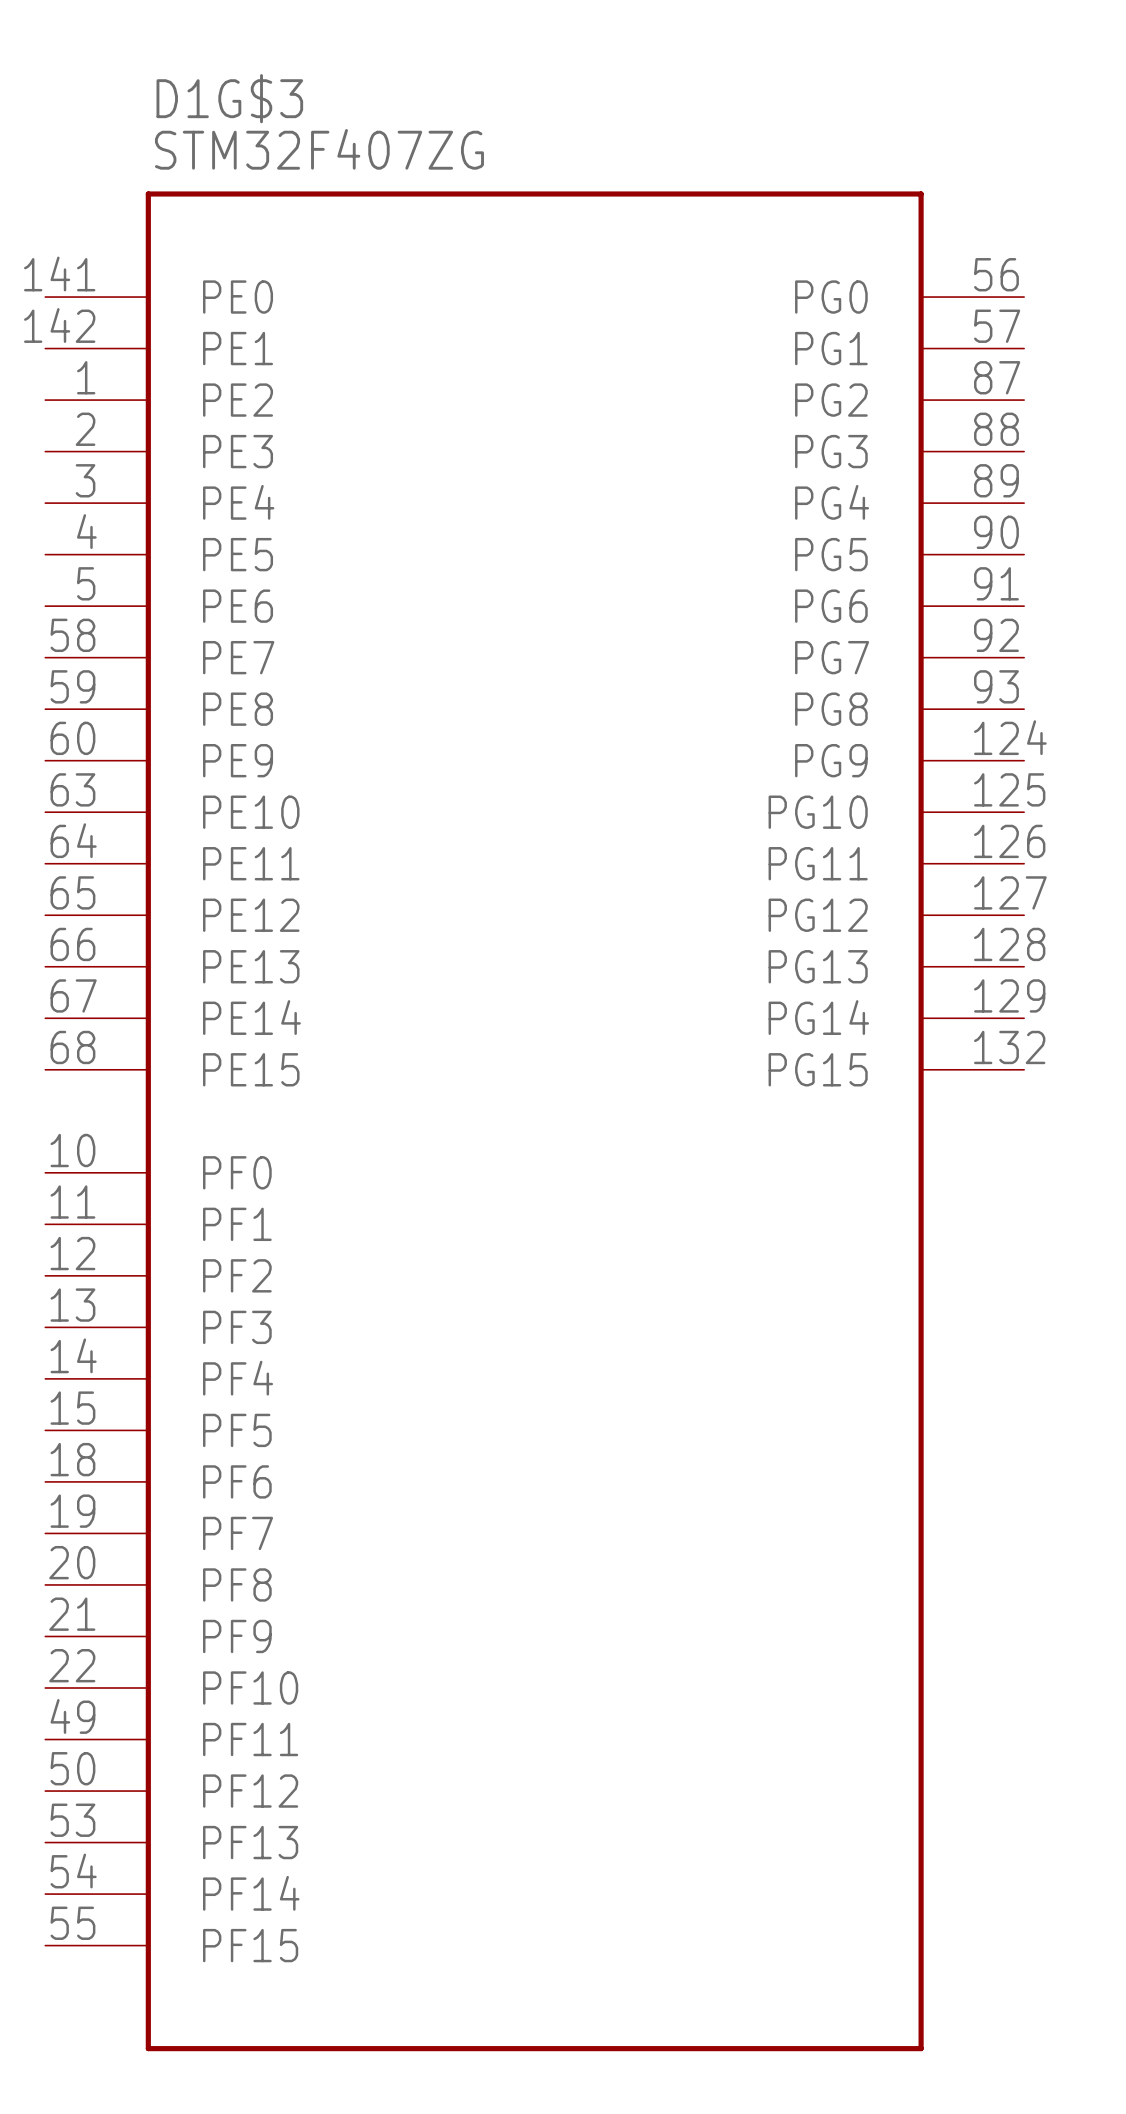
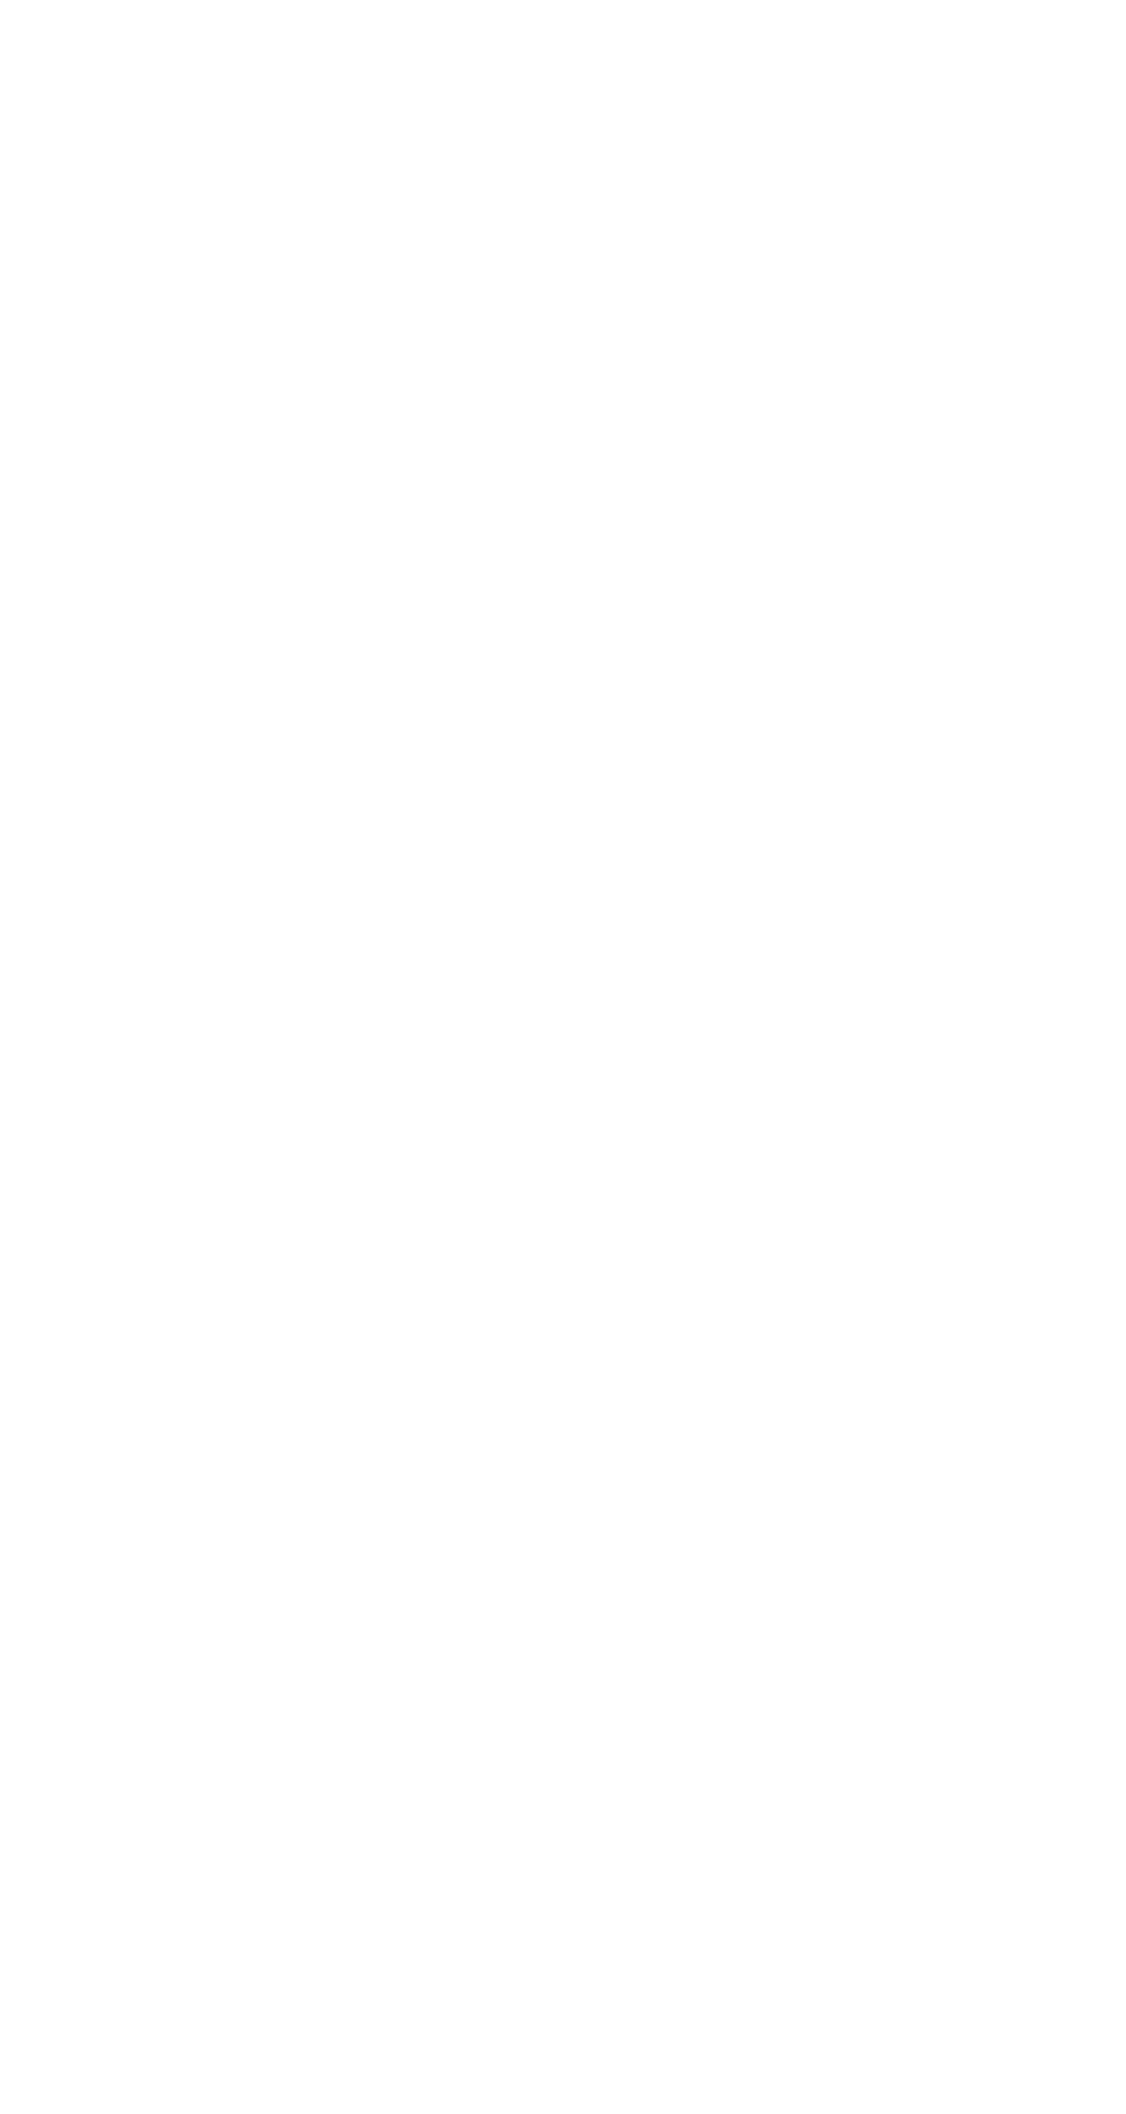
D1G$3: STM32F407ZG (534, 1121) -> none

